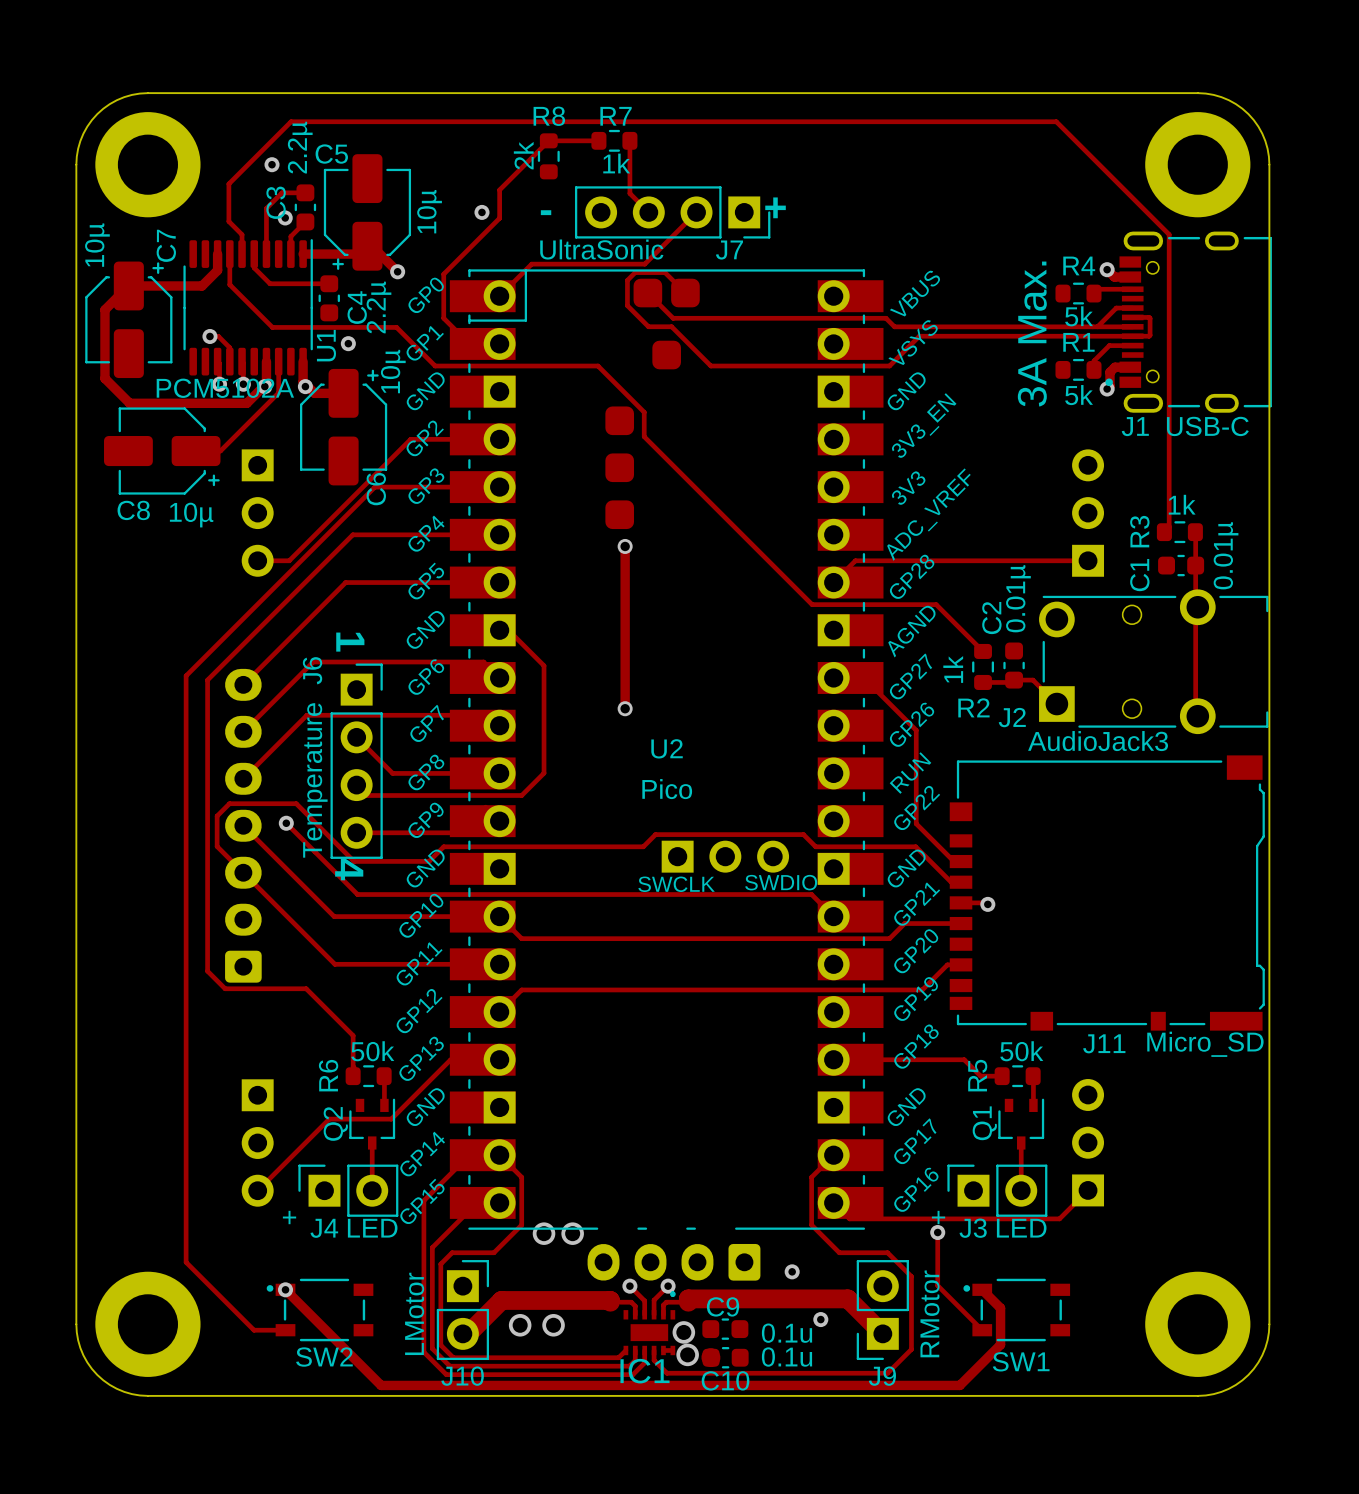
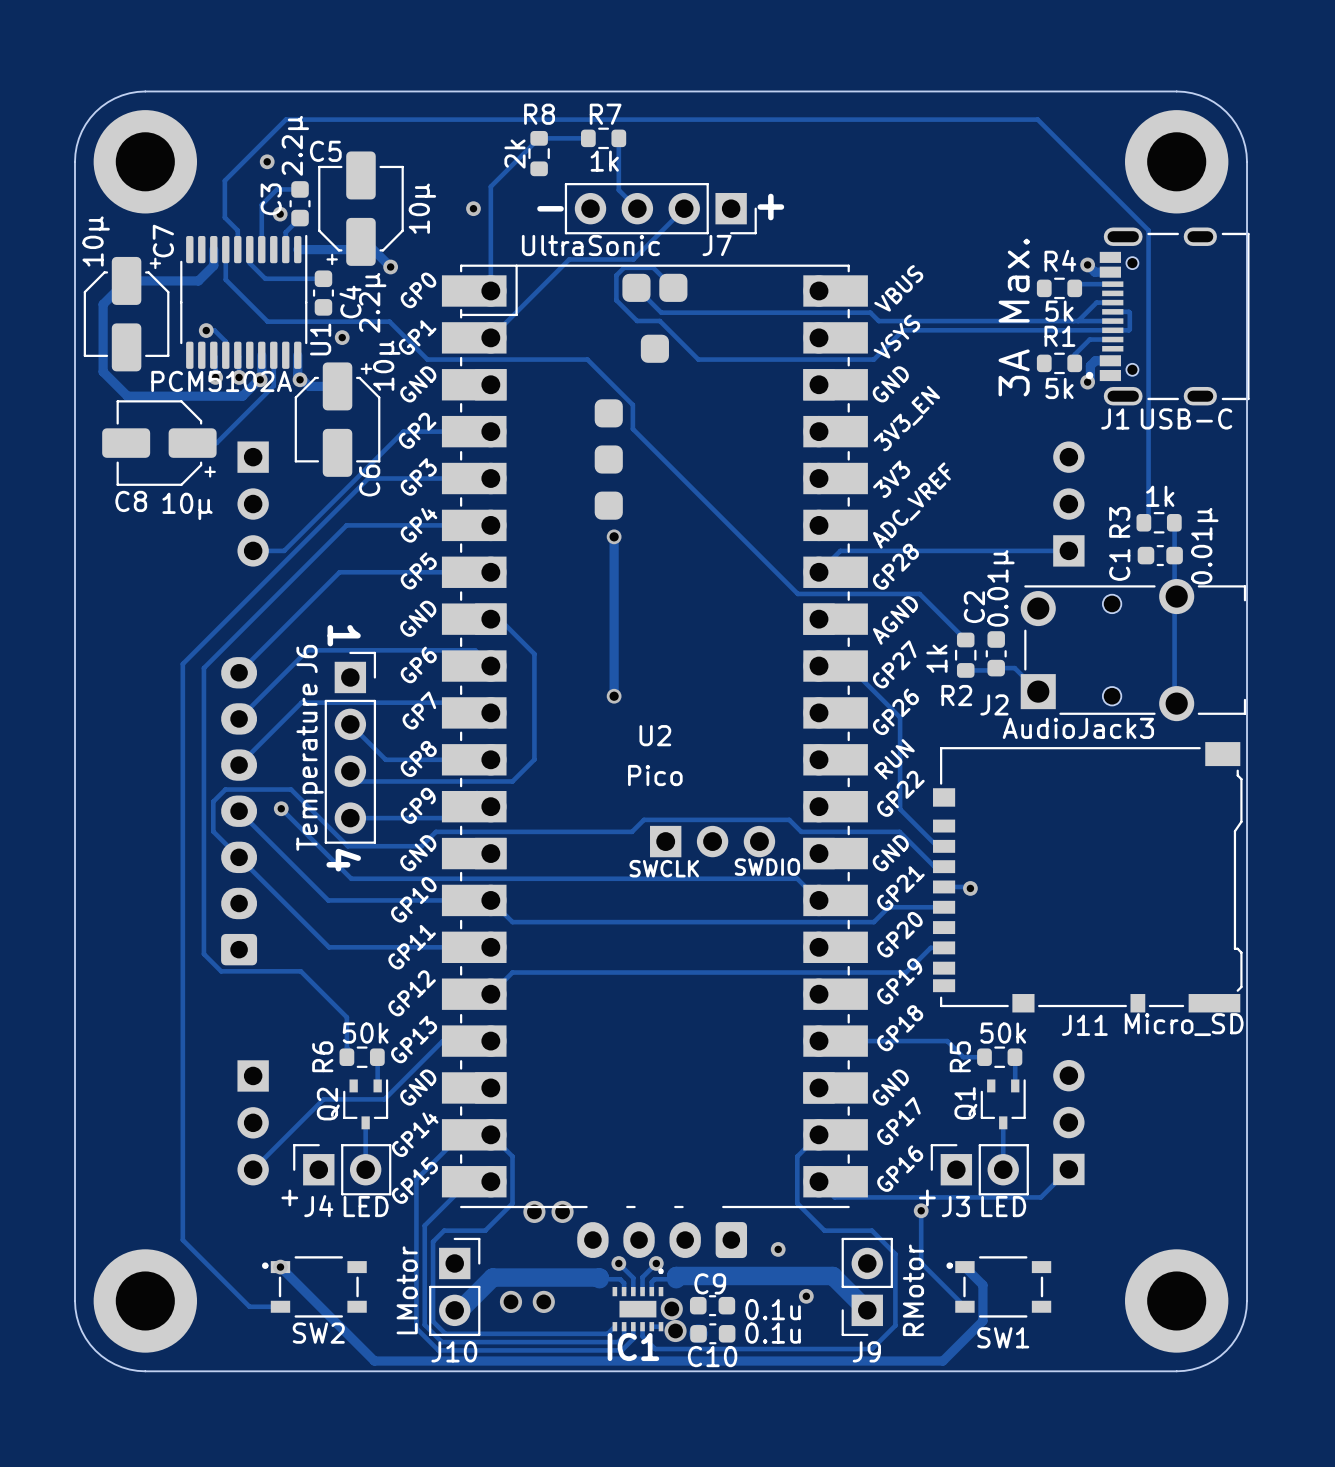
track: (499, 218) (443, 274) (443, 318) (469, 343) (499, 343) -> (490, 214) (490, 290)
track: (579, 264) (531, 264) (499, 296) -> (569, 259) (490, 337)

